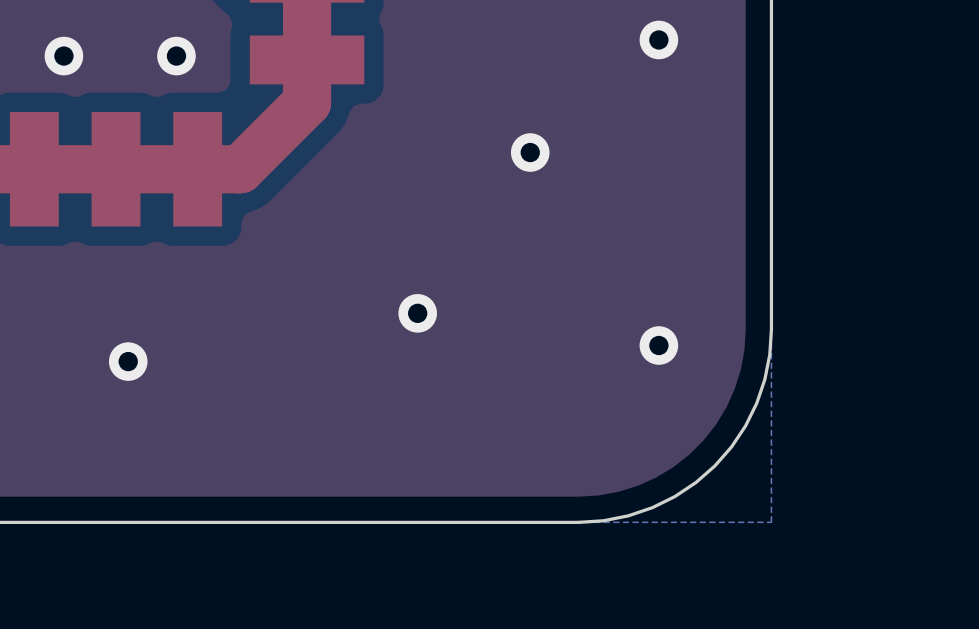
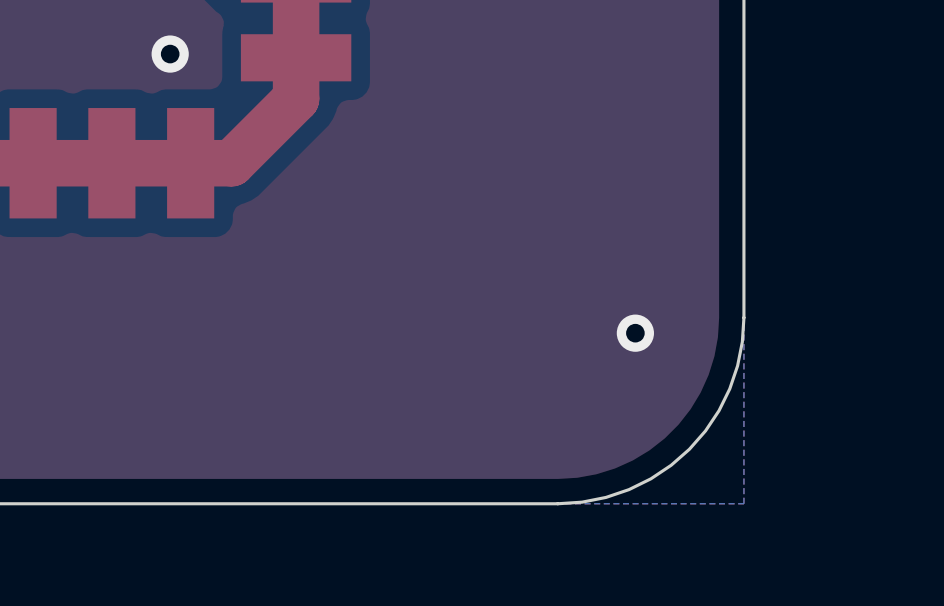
via: (658, 39) -> none
via: (63, 56) -> none
via: (530, 152) -> none
via: (417, 313) -> none
via: (128, 361) -> none

